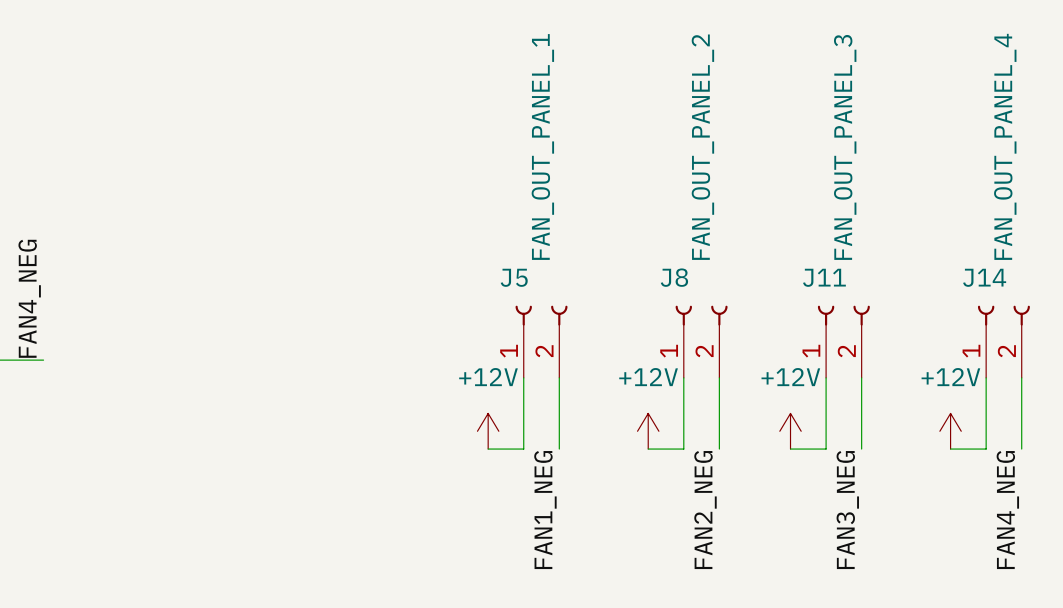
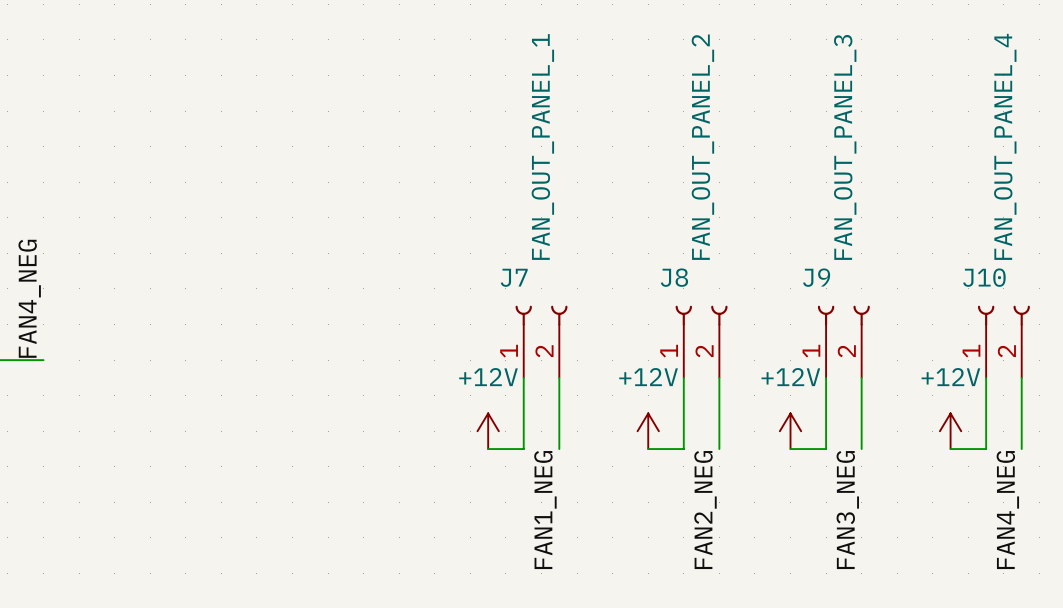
J5 name: J5 (514, 277) -> J7 (514, 277)
J11 name: J11 (824, 277) -> J9 (816, 277)
J14 name: J14 (984, 277) -> J10 (984, 277)

